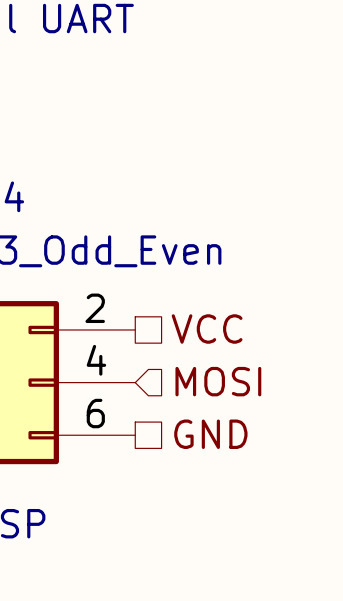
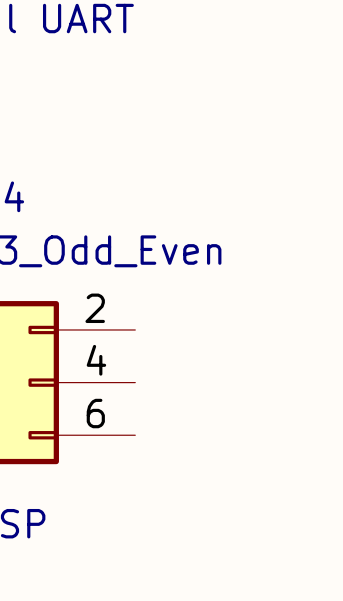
hierarchical label: VCC (207, 329) -> none
hierarchical label: MOSI (218, 381) -> none
hierarchical label: GND (210, 434) -> none

